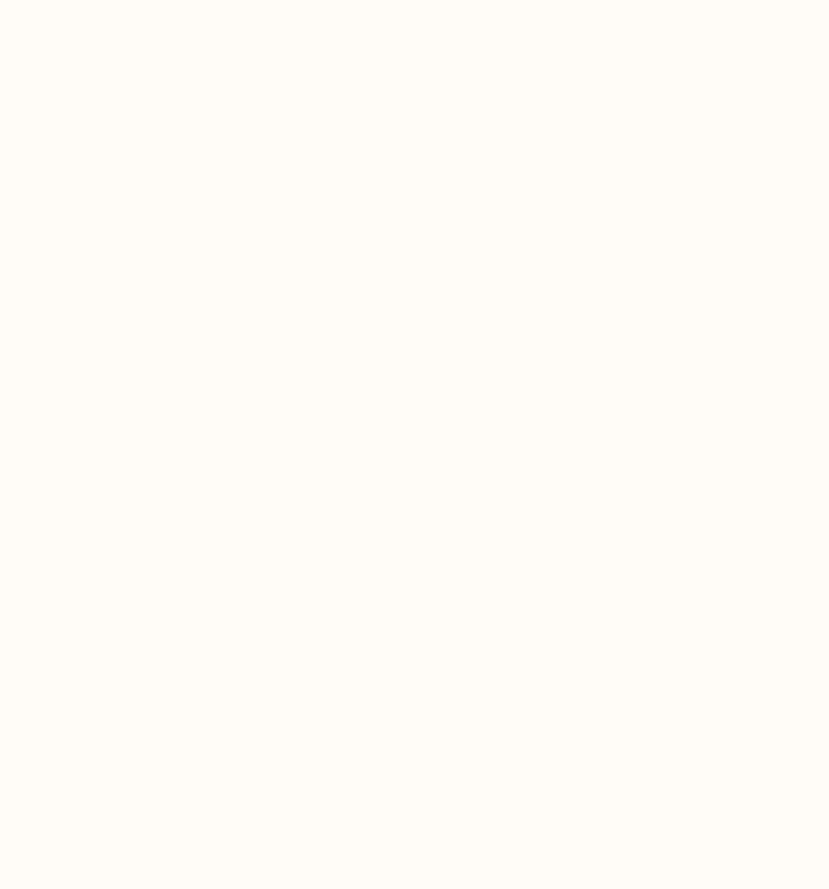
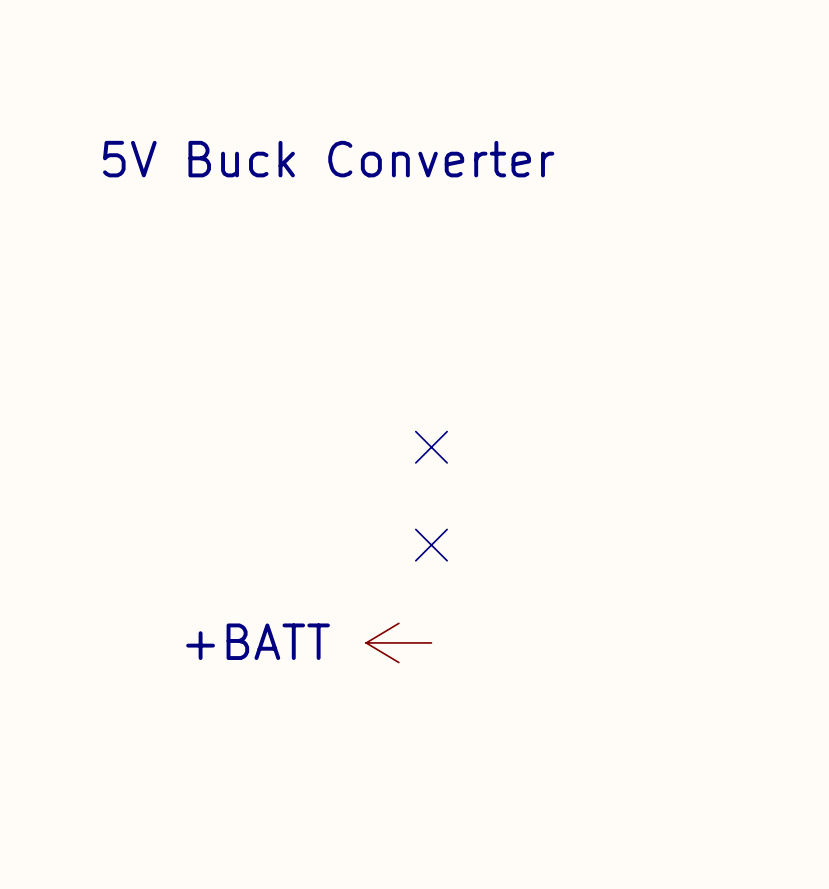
text: none -> 5V Buck Converter (328, 159)
no-connect mark: none -> (431, 447)
no-connect mark: none -> (431, 545)
power symbol: none -> +BATT (398, 642)

